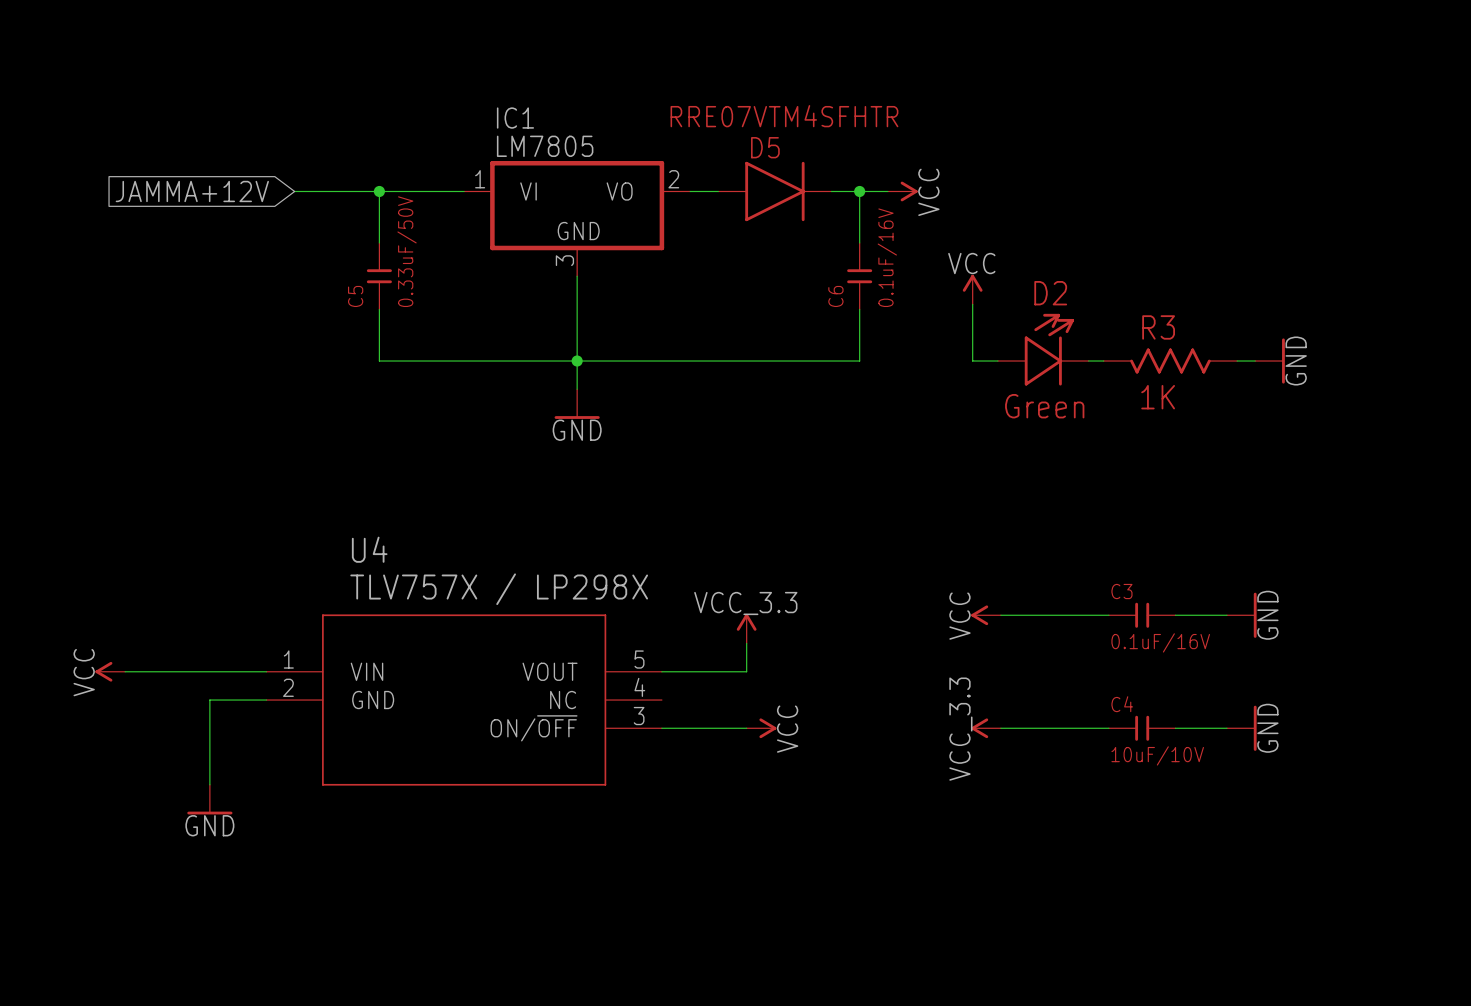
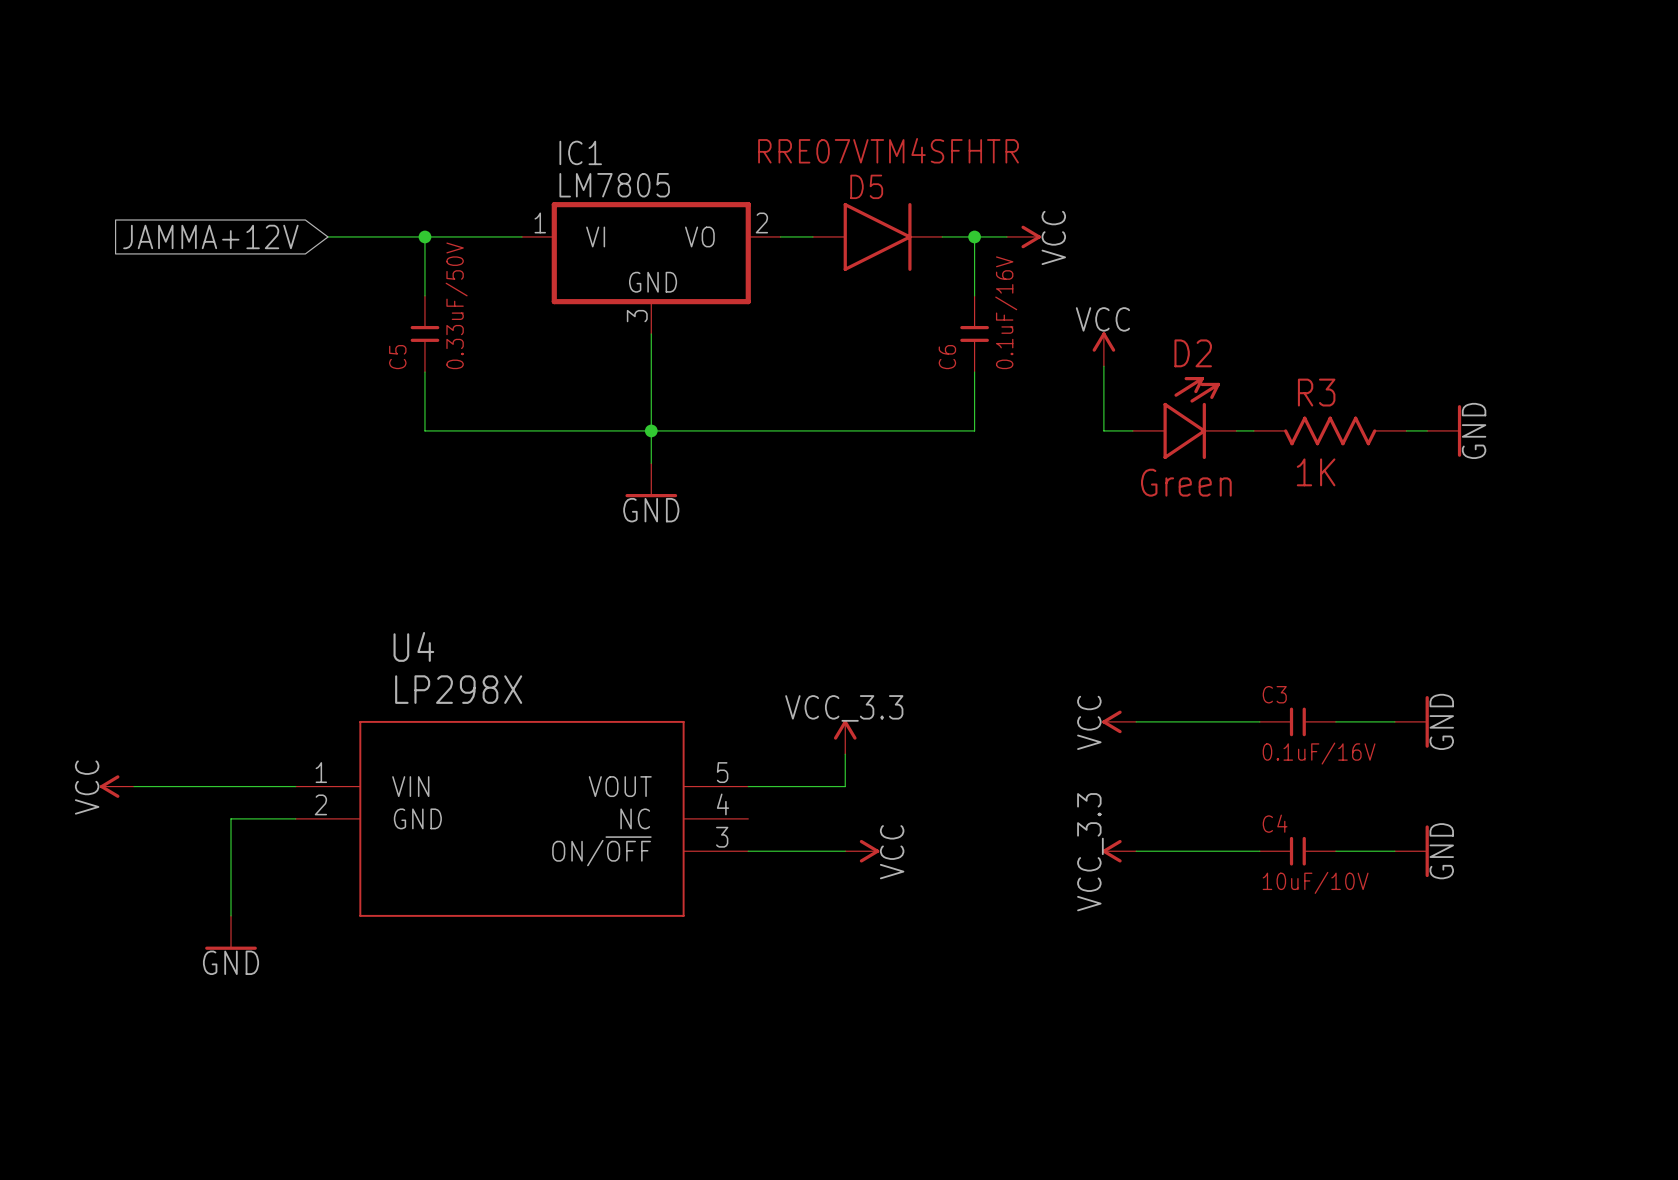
U4 value: TLV757X / LP298X (499, 589) -> LP298X (458, 689)

